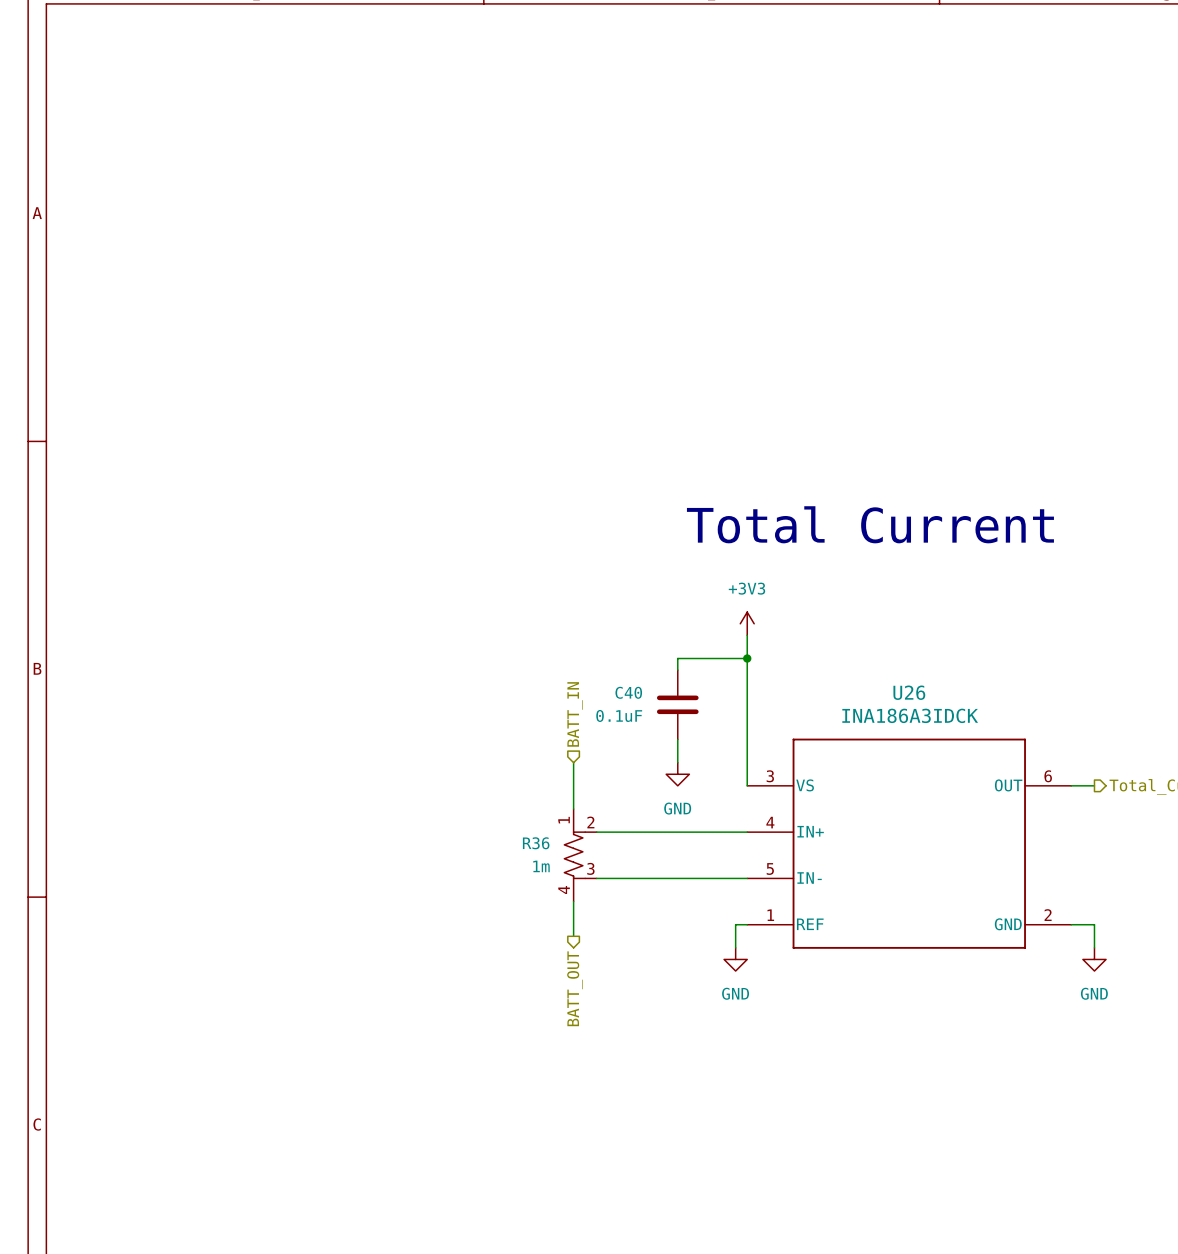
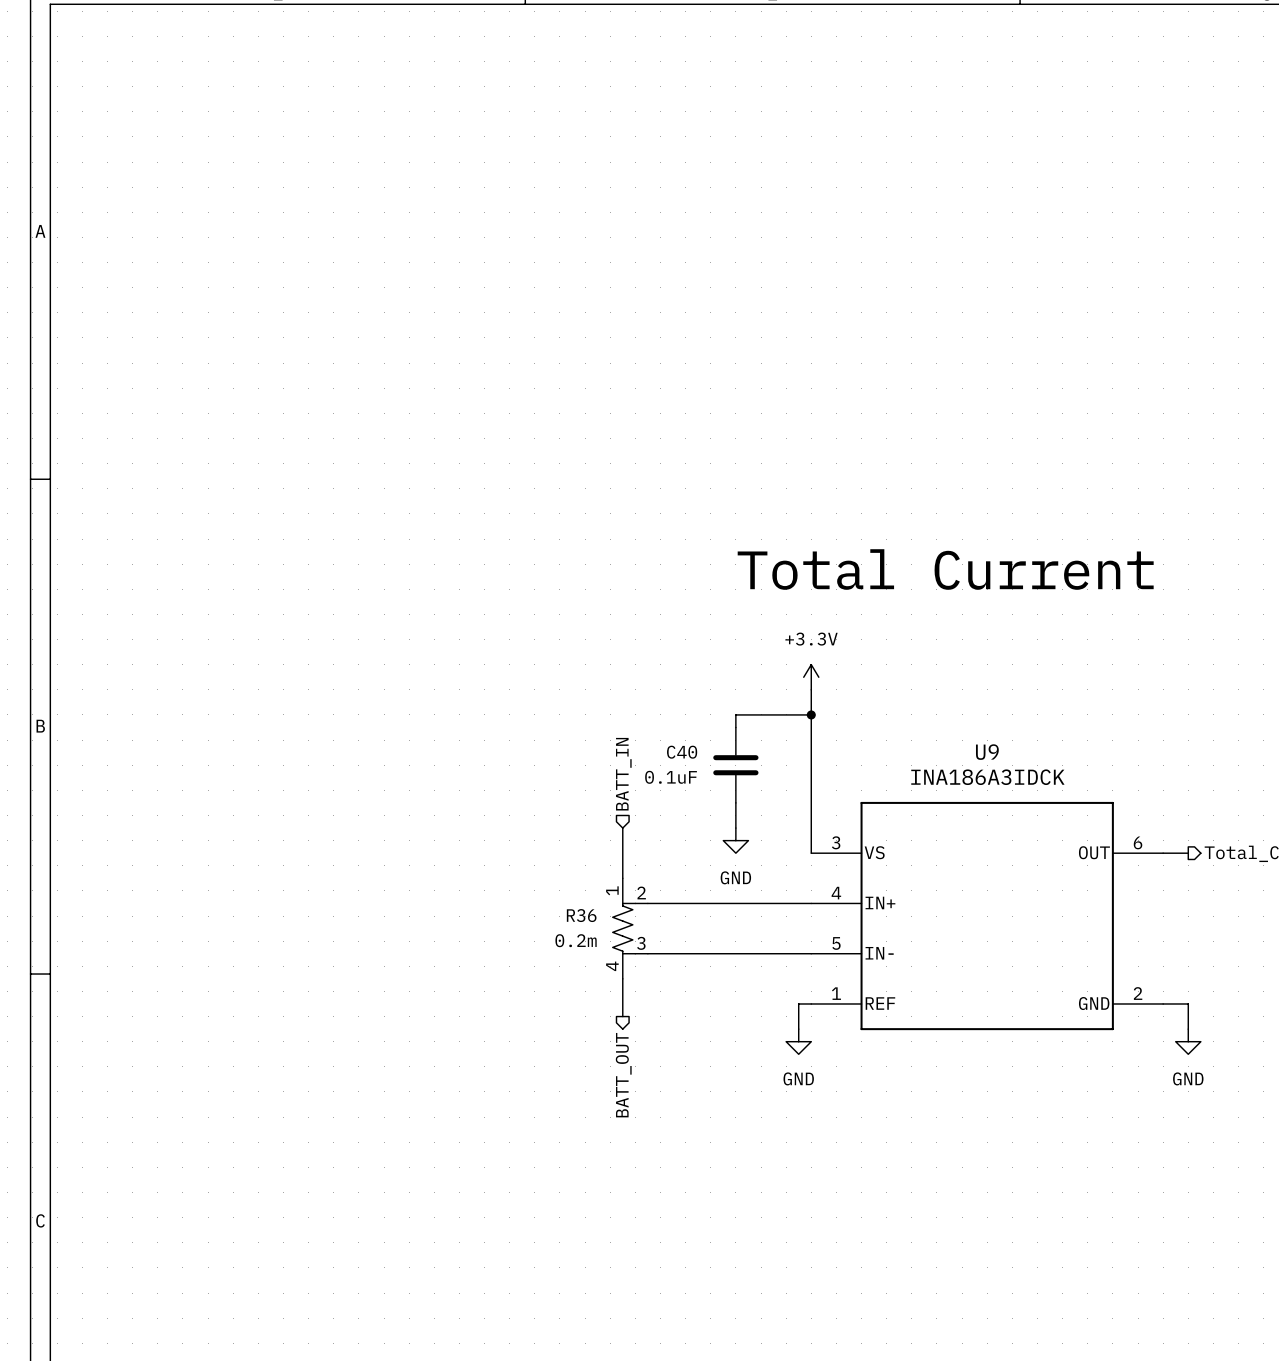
power symbol: +3V3 (747, 623) -> +3.3V (811, 677)
U26 name: U26 (909, 692) -> U9 (987, 752)
R36 value: 1m (541, 866) -> 0.2m (576, 940)

